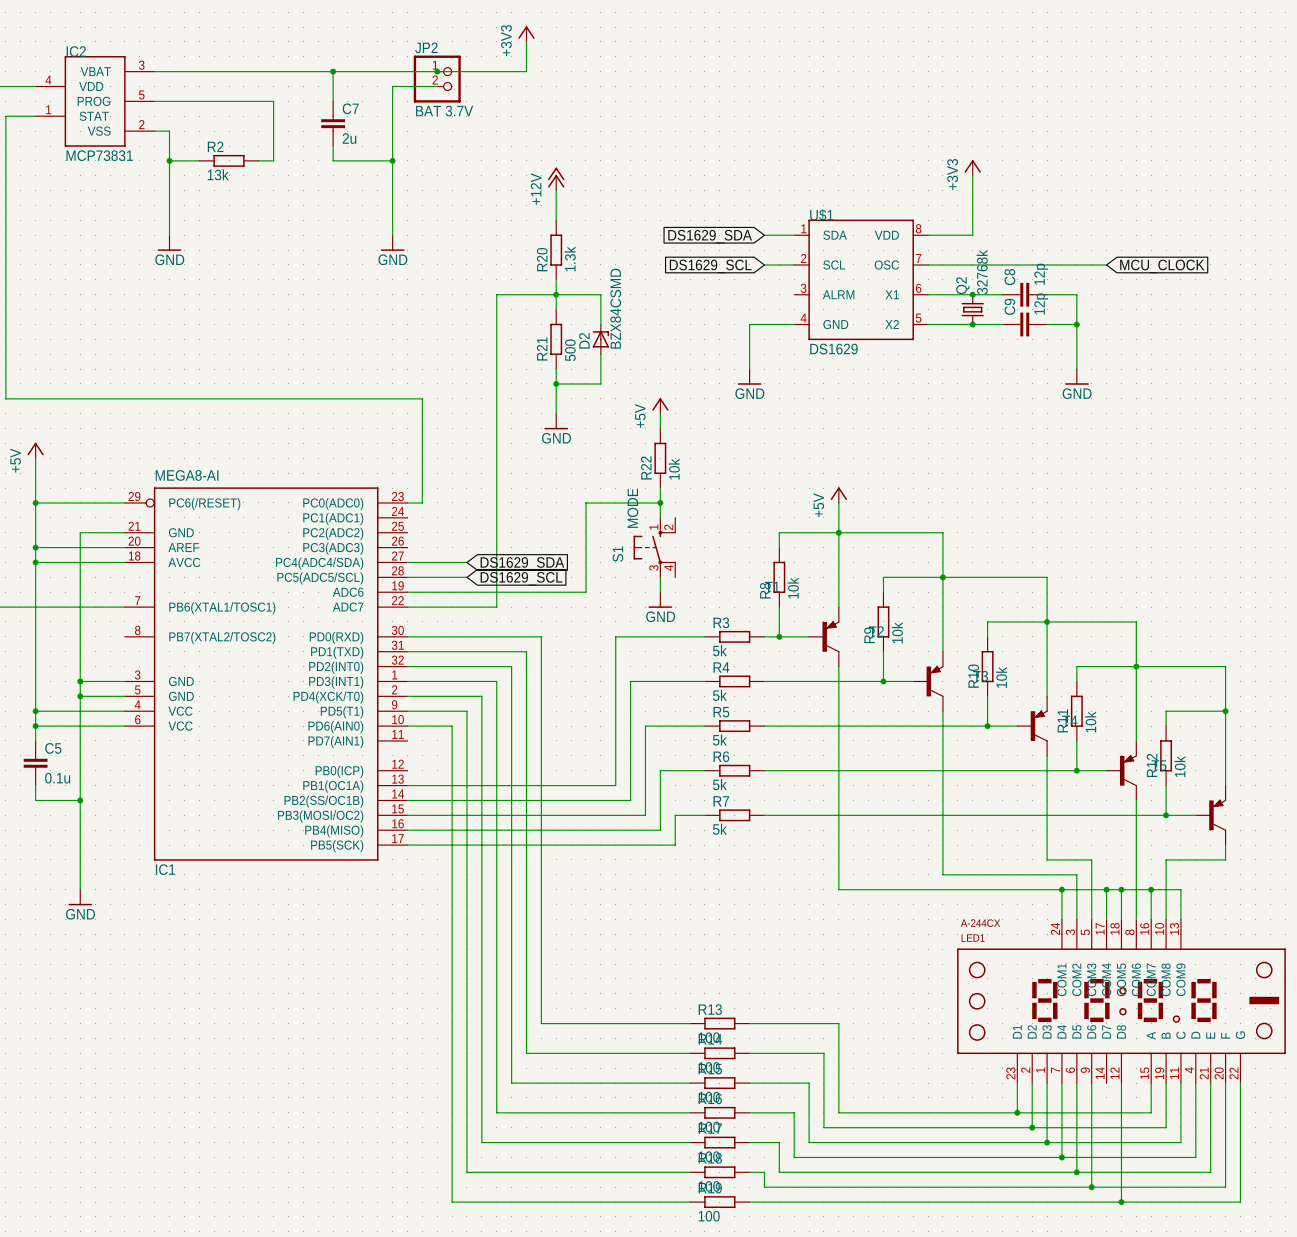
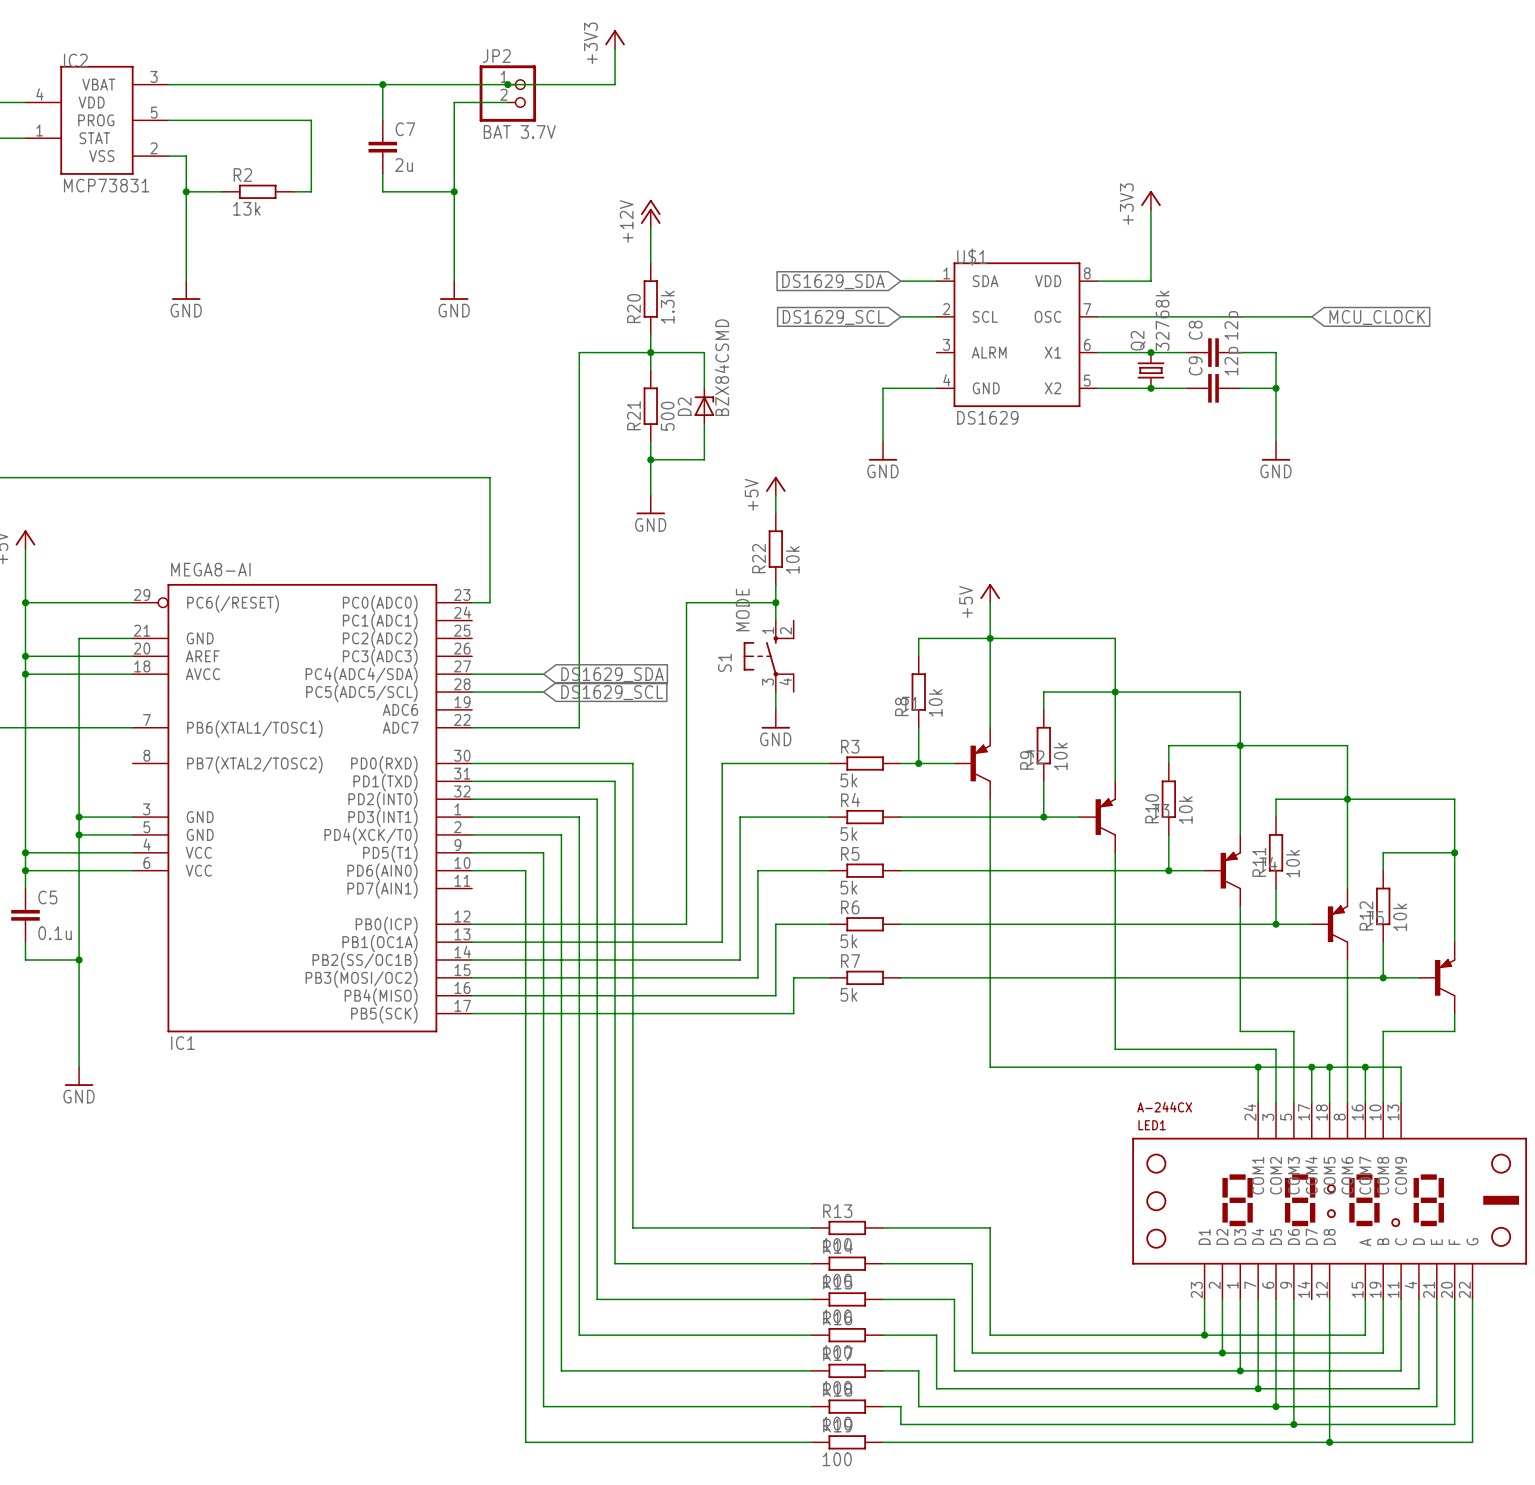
wire: (407, 592) (585, 592) -> (472, 924) (686, 924) (686, 709)

